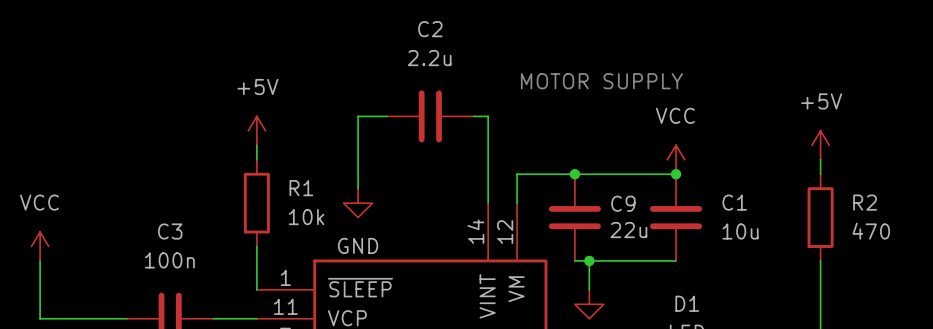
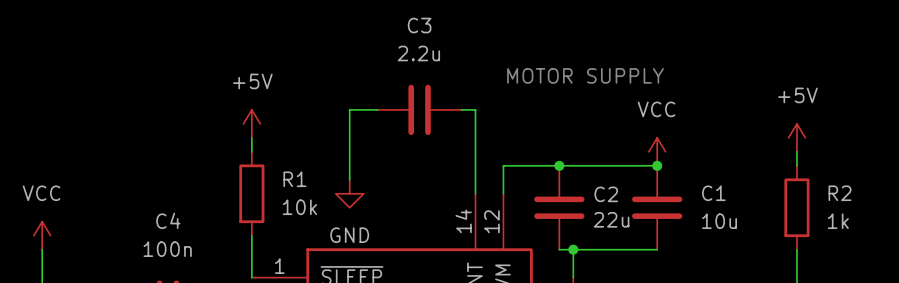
C2 name: C2 (430, 29) -> C3 (419, 25)
C9 name: C9 (623, 203) -> C2 (606, 194)
C3 name: C3 (170, 231) -> C4 (168, 220)
R2 value: 470 (871, 231) -> 1k (838, 221)

